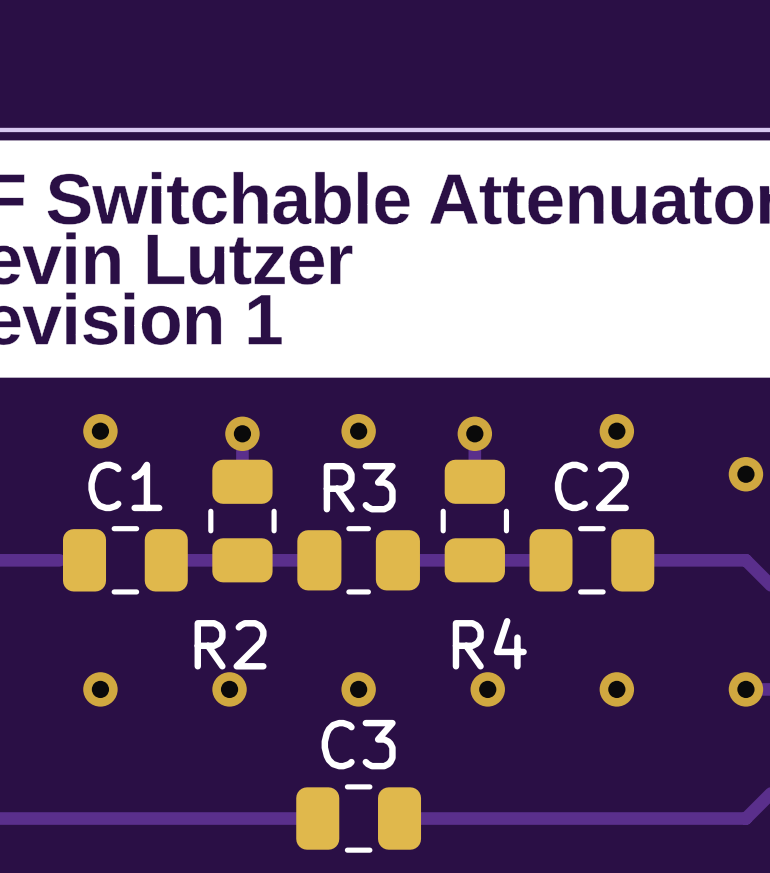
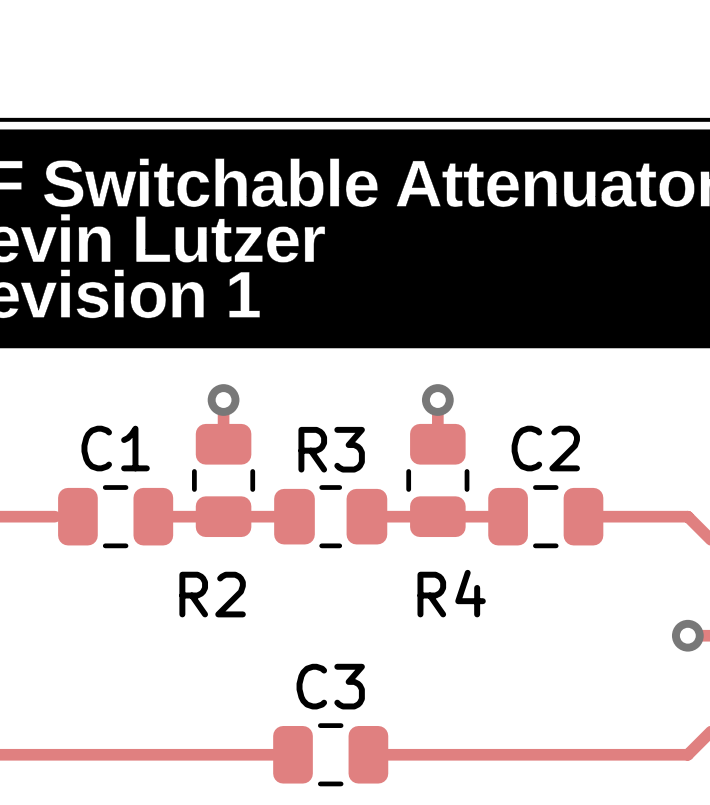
via: (100, 431) -> none
via: (358, 431) -> none
via: (616, 431) -> none
via: (745, 474) -> none
via: (100, 689) -> none
via: (229, 689) -> none
via: (358, 689) -> none
via: (487, 689) -> none
via: (616, 689) -> none

